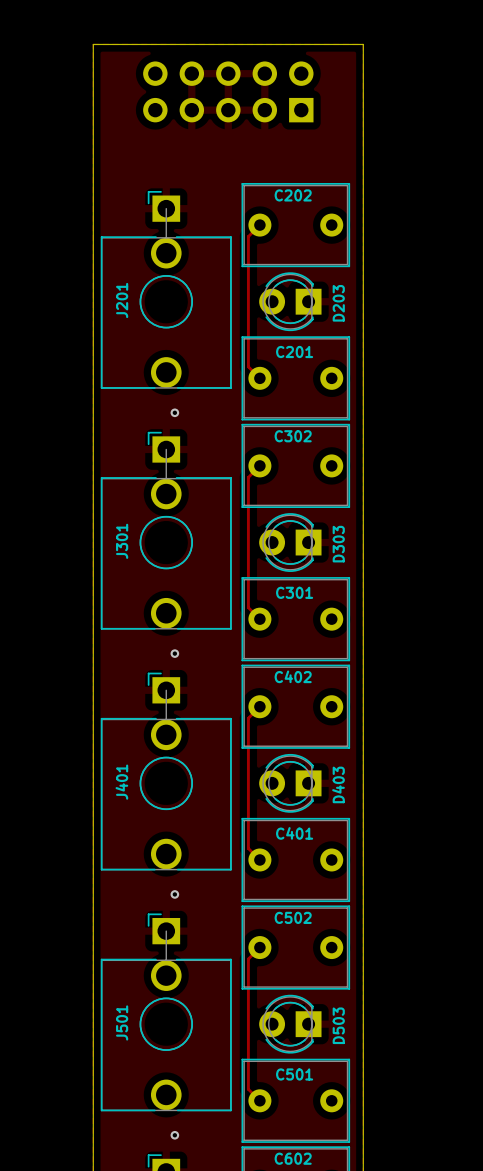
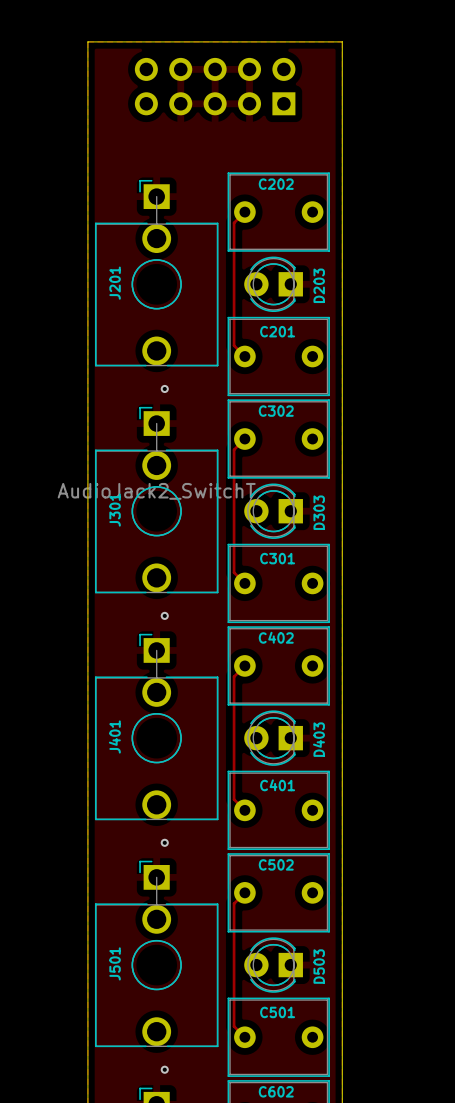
J301 value: none -> AudioJack2_SwitchT (156, 491)

